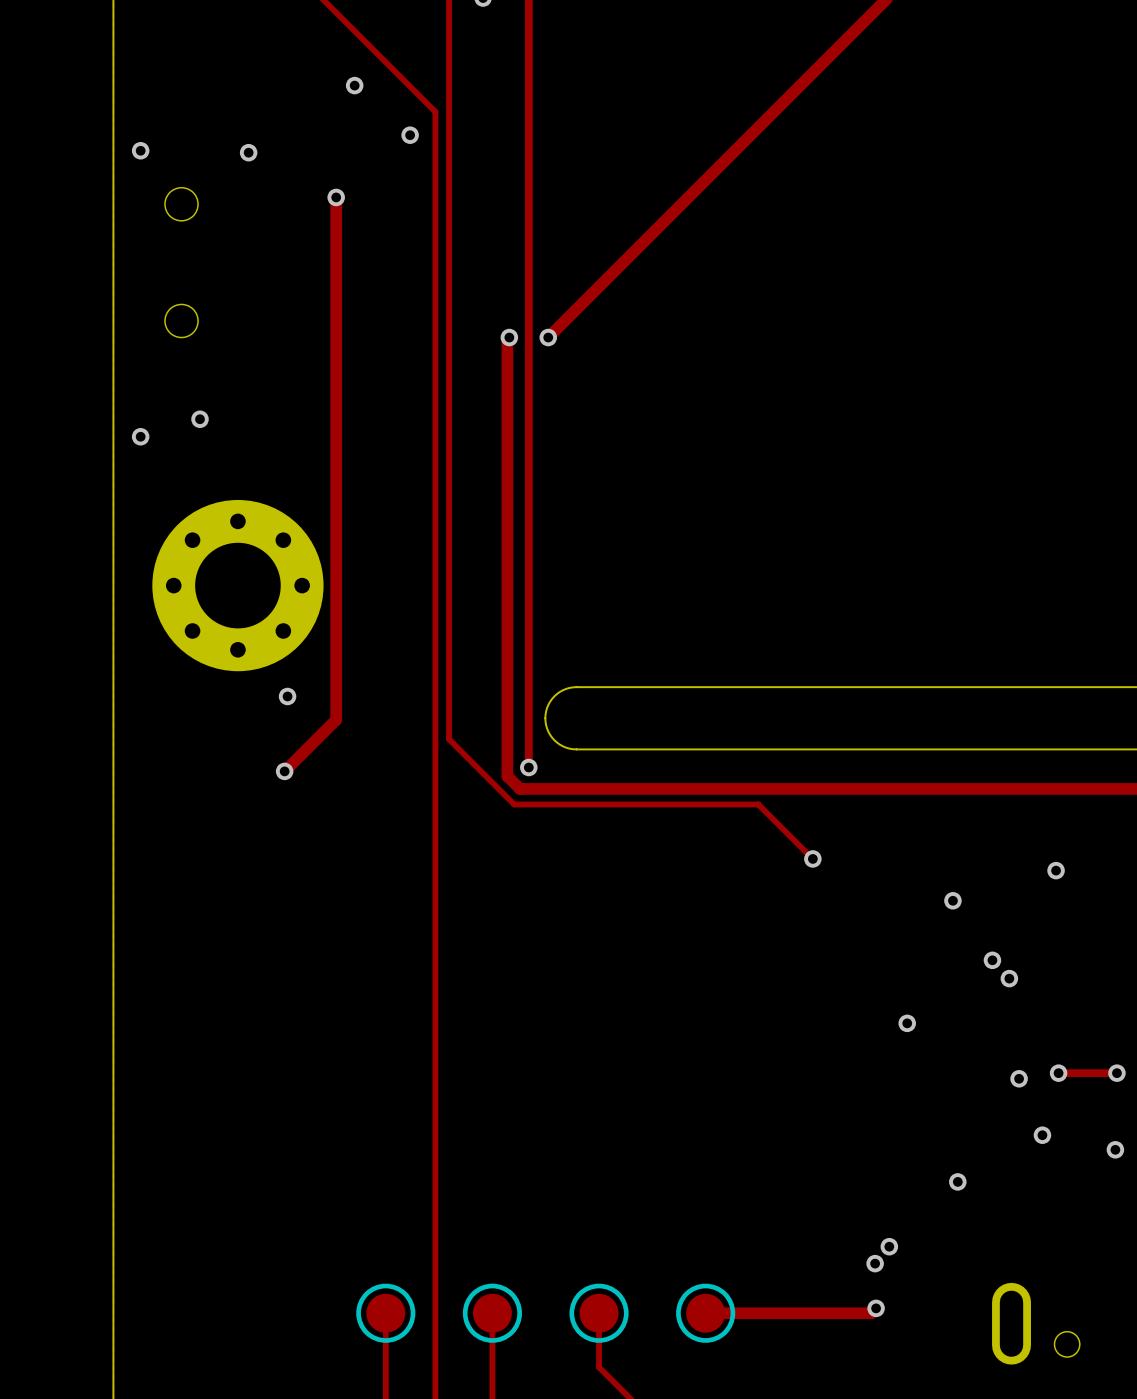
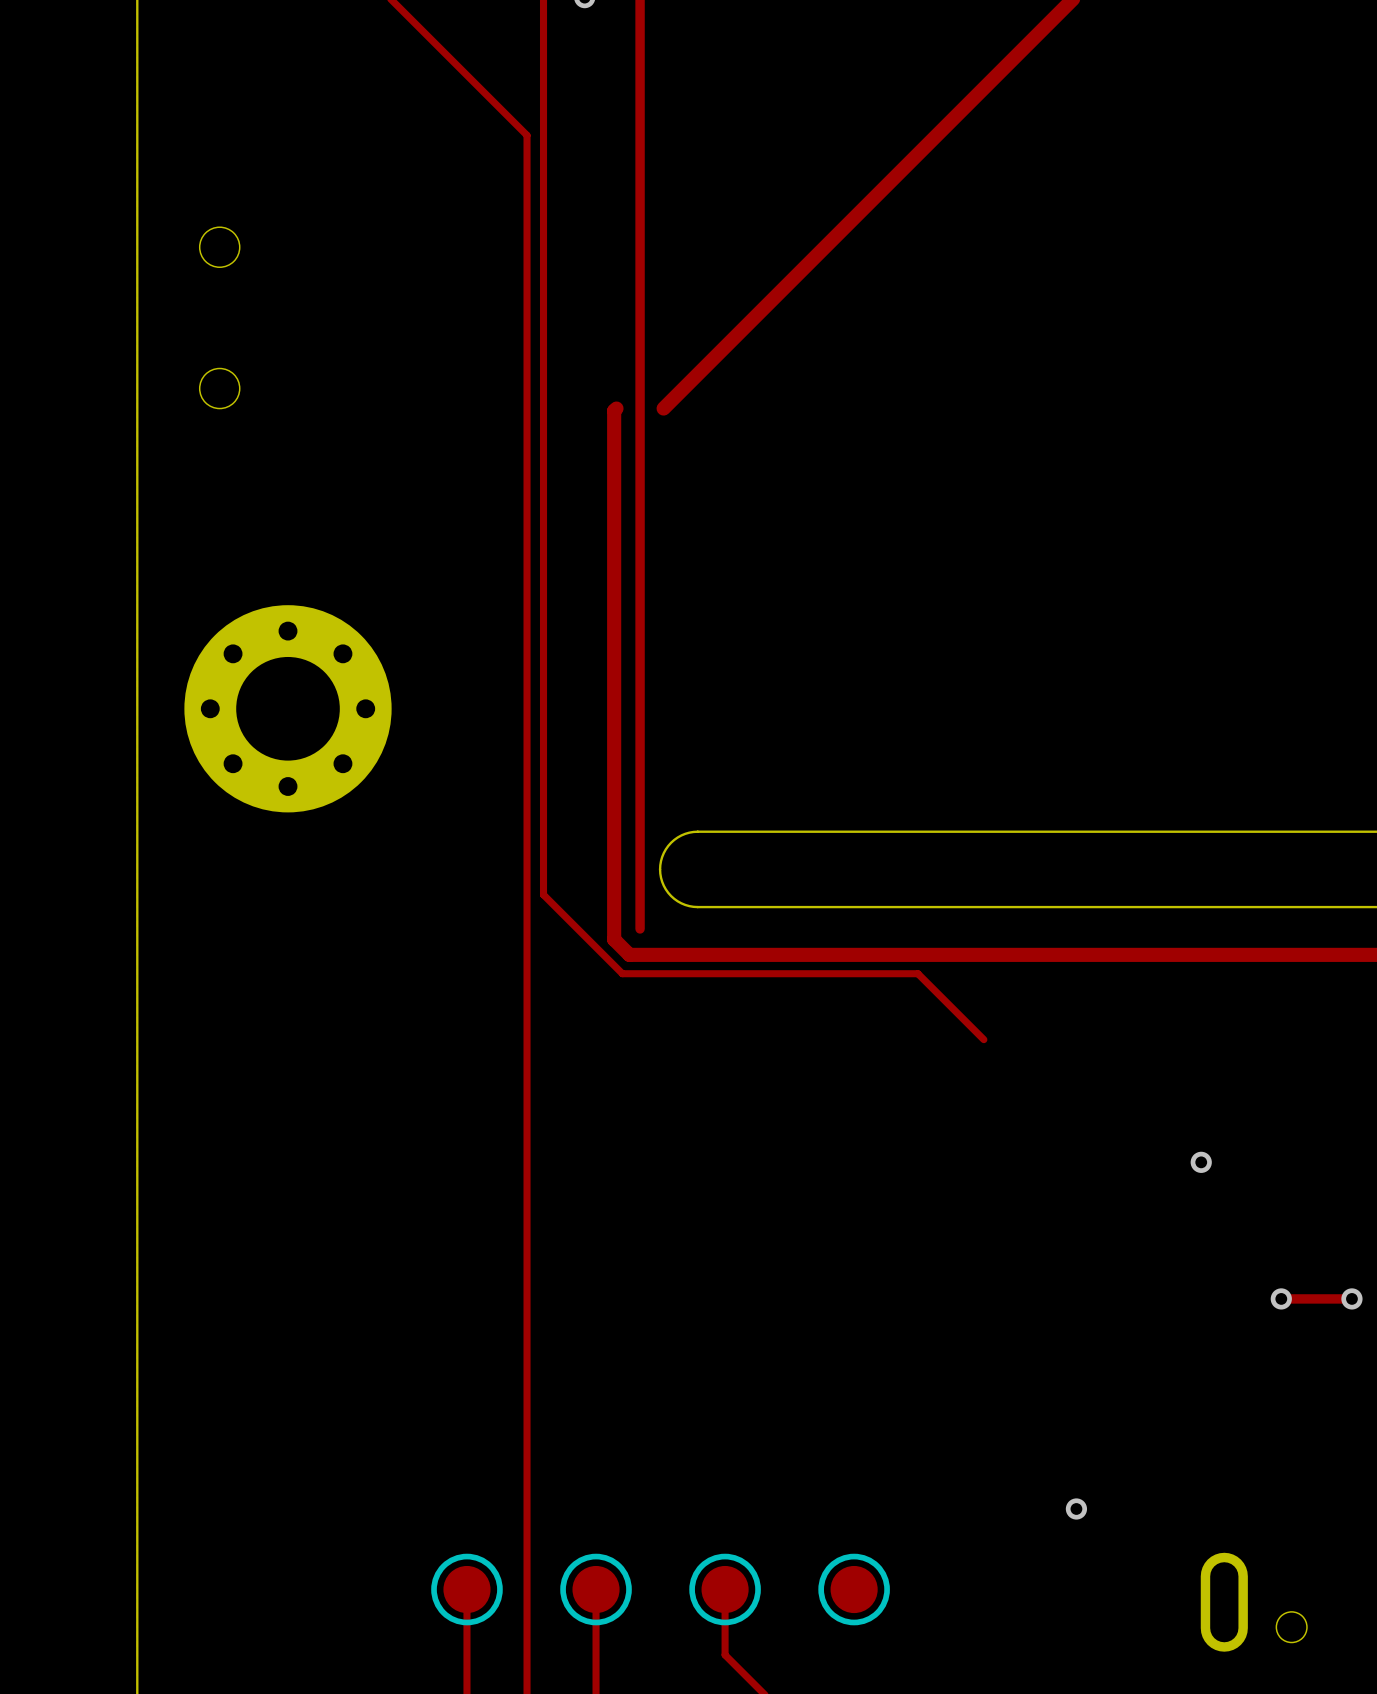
via: (354, 85) -> none
via: (410, 135) -> none
via: (140, 150) -> none
via: (248, 152) -> none
track: (336, 197) (336, 719) (284, 771) -> none
via: (336, 197) -> none
via: (509, 337) -> none
via: (548, 337) -> none
via: (200, 419) -> none
via: (140, 436) -> none
via: (287, 696) -> none
via: (528, 767) -> none
via: (284, 771) -> none
via: (812, 858) -> none
via: (1056, 870) -> none
via: (952, 900) -> none
via: (1009, 978) -> none
via: (907, 1023) -> none
via: (1019, 1078) -> none
via: (1042, 1135) -> none
via: (1115, 1149) -> none
via: (957, 1181) -> none
via: (875, 1263) -> none
track: (876, 1308) (871, 1313) (705, 1313) -> none
via: (876, 1308) -> none

